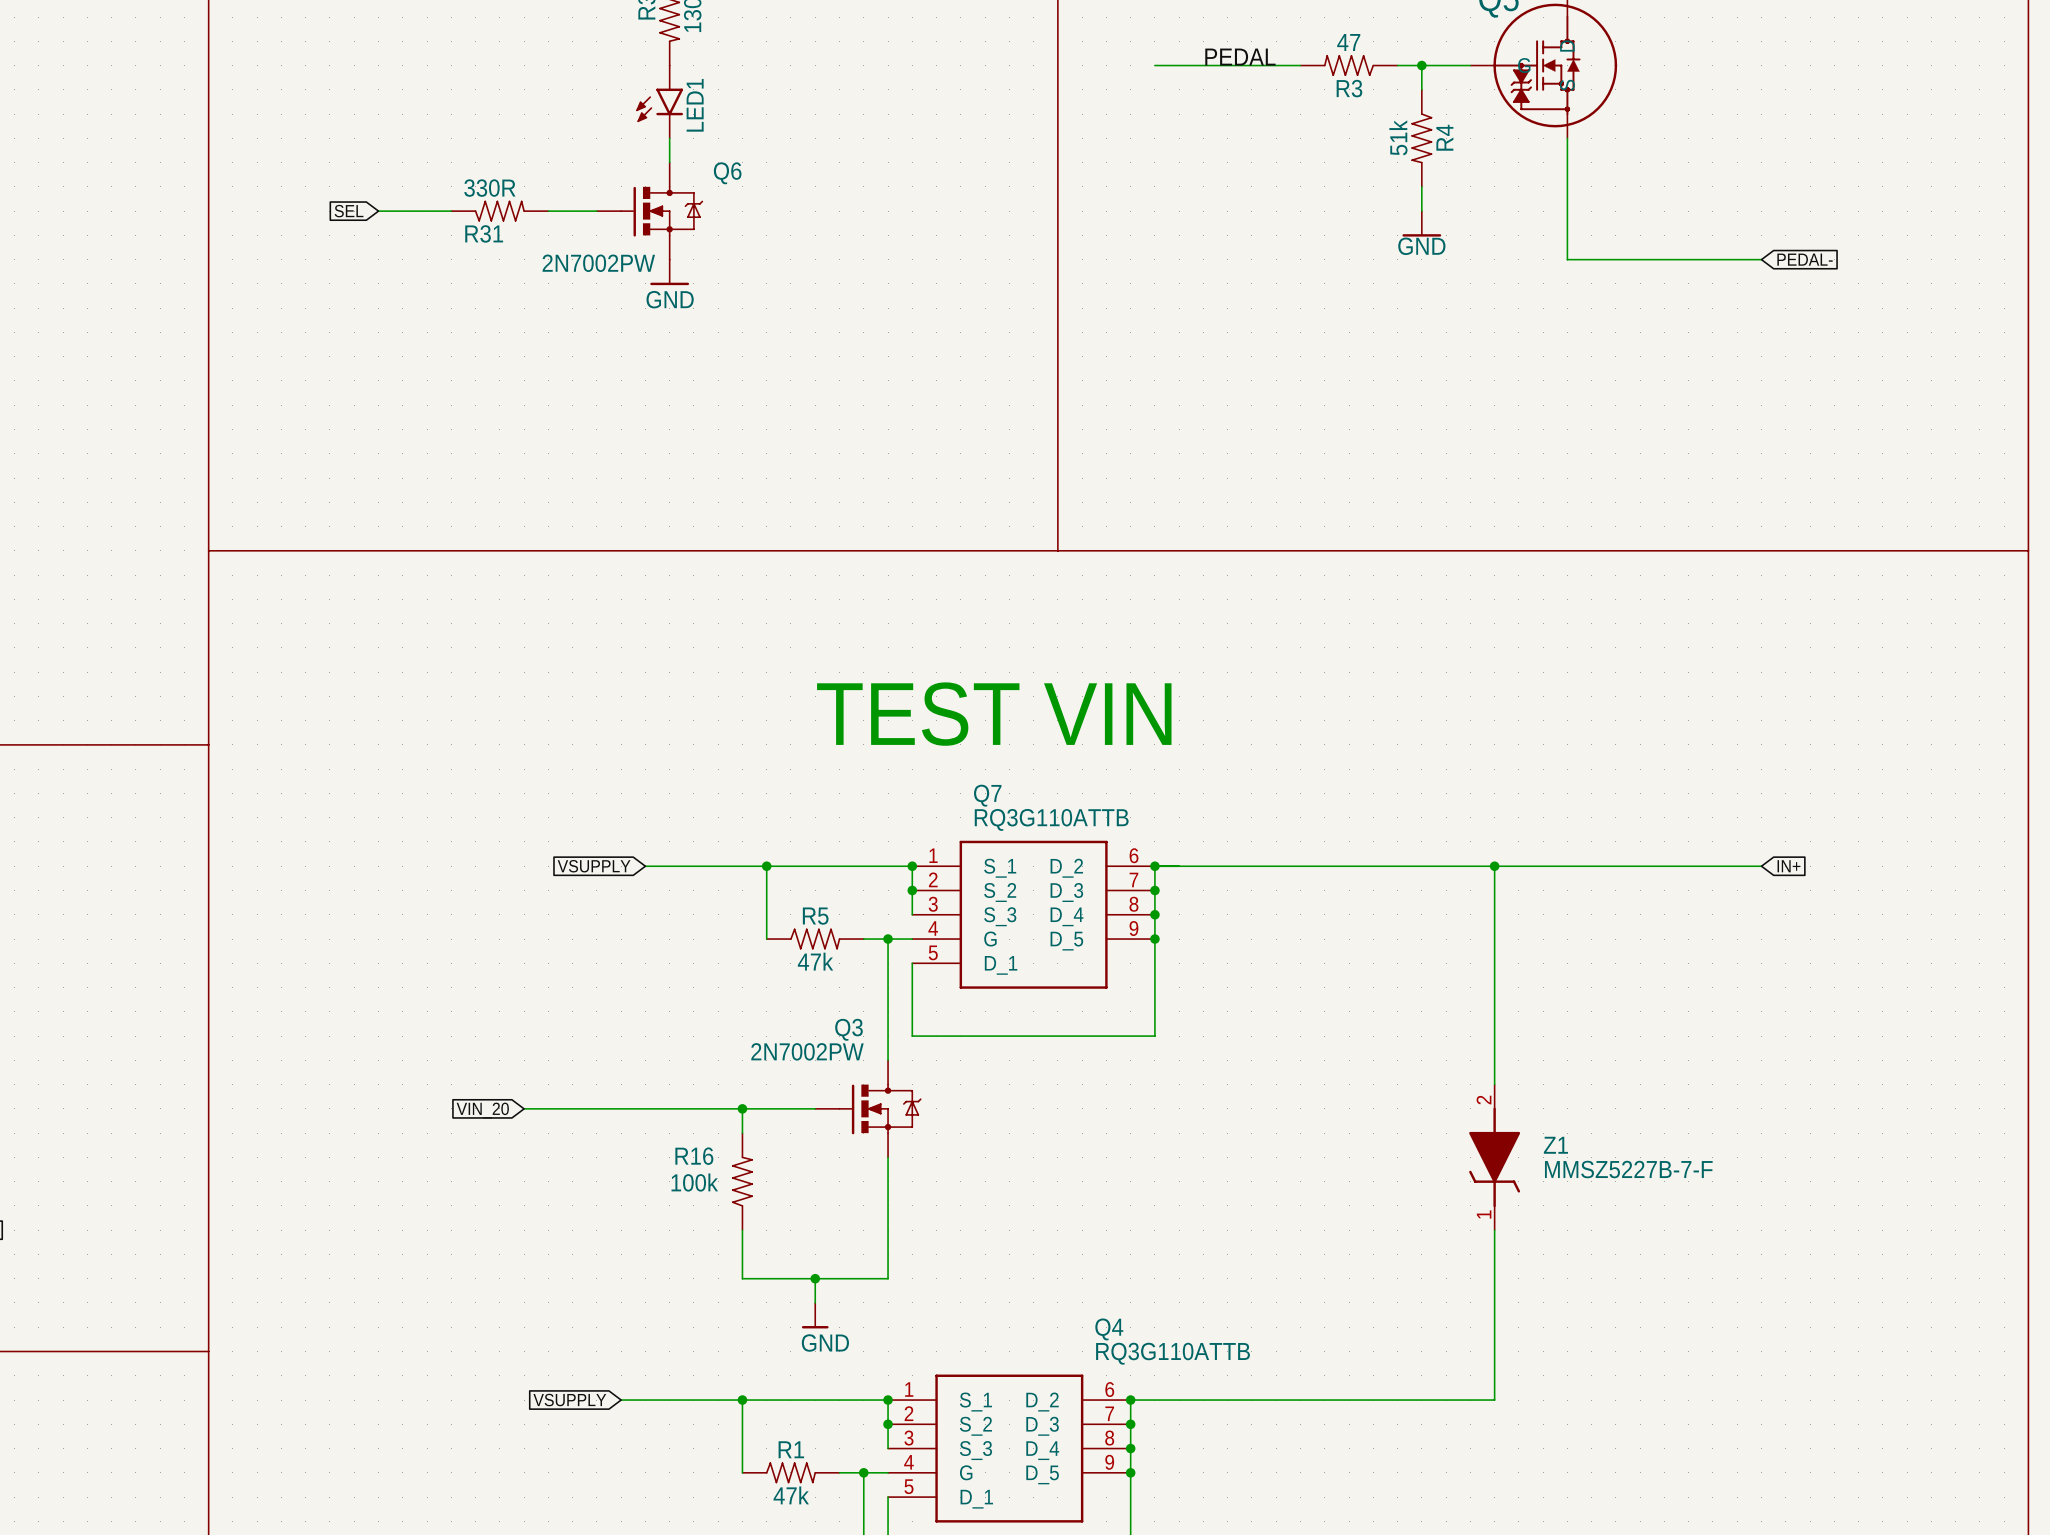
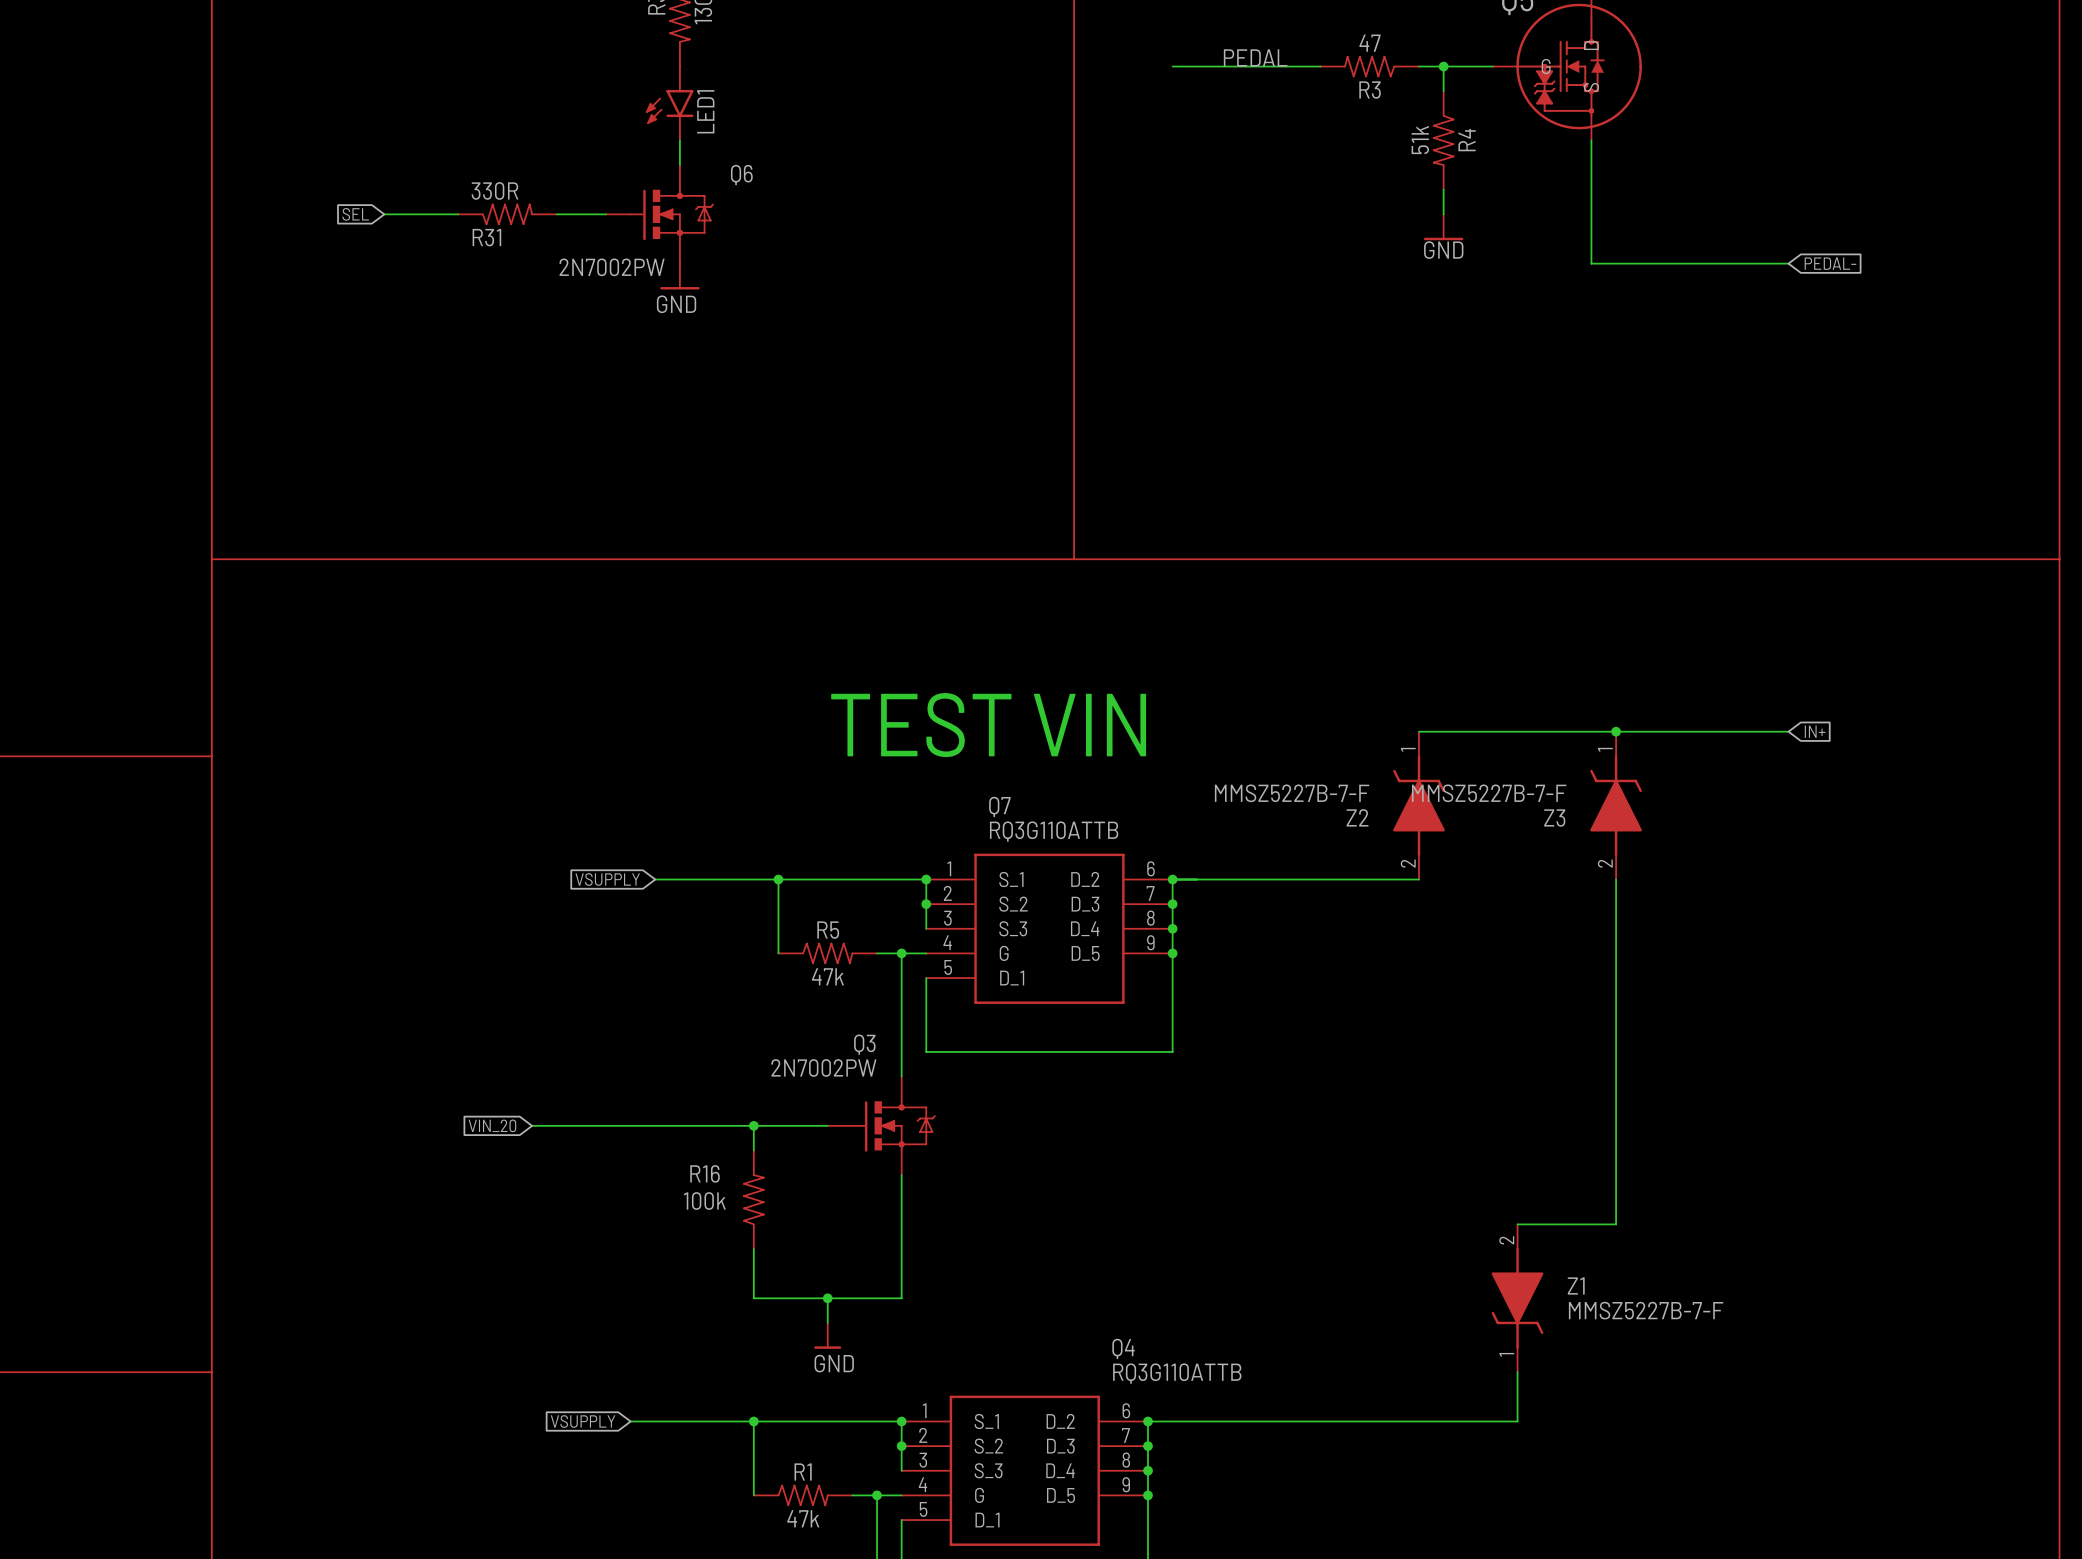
junction: none -> (1616, 731)
Z2: none -> MMSZ5227B-7-F (1418, 805)
Z3: none -> MMSZ5227B-7-F (1616, 805)
wire: (1397, 866) (1761, 866) -> (1418, 731) (1788, 731)
wire: (1494, 866) (1494, 1084) -> none
junction: (1494, 866) -> none
wire: none -> (1616, 879) (1616, 1224) (1517, 1224)
global label position: IN+ (1788, 866) -> IN+ (1815, 731)
Z1 position: (1494, 1157) -> (1517, 1298)

